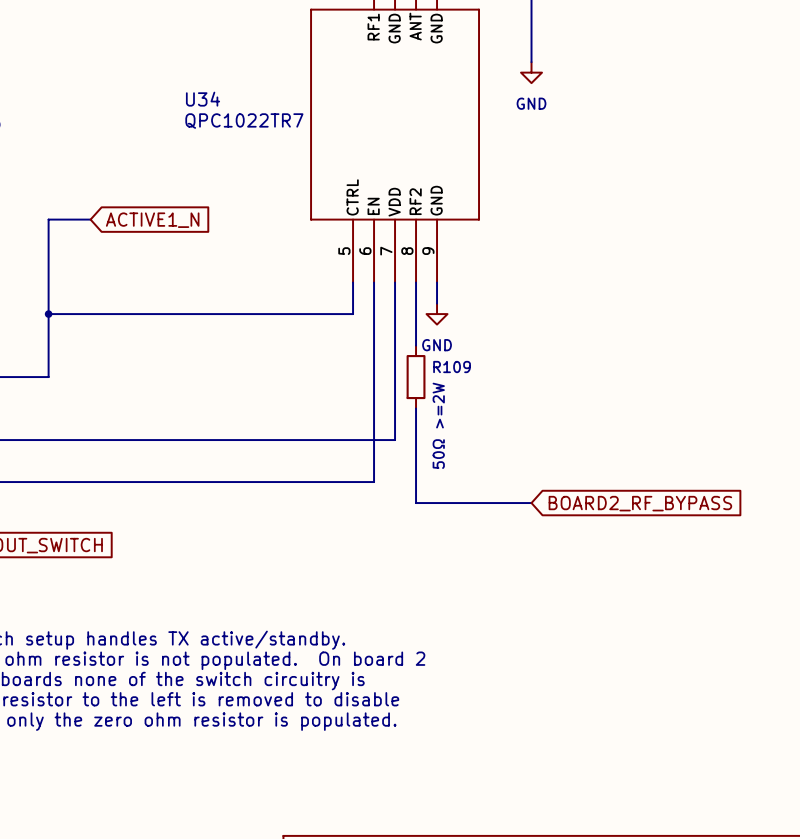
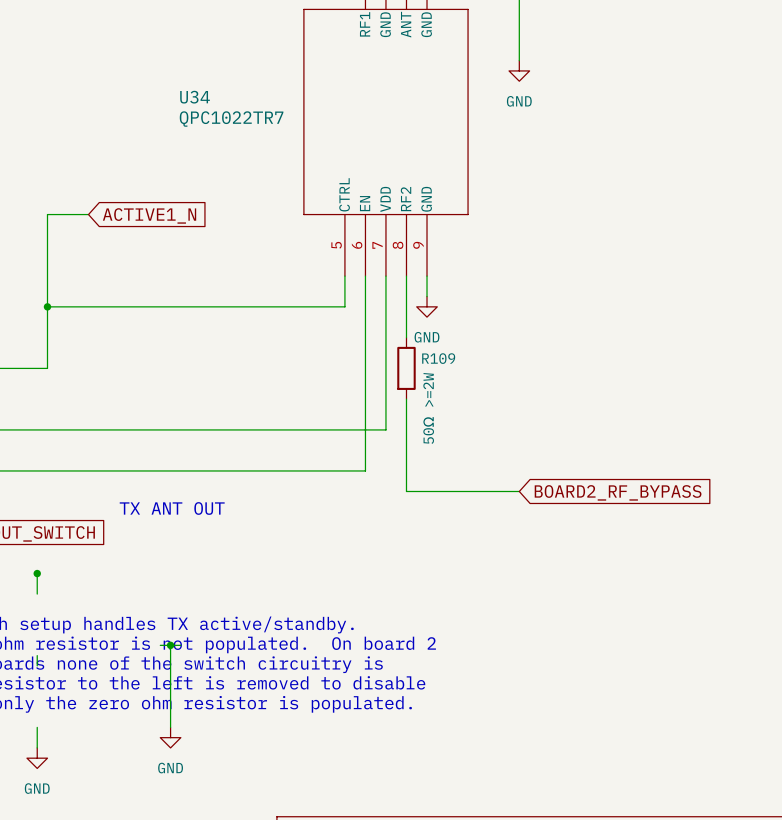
text: none -> TX ANT OUT (172, 508)
wire: none -> (37, 573) (37, 594)
junction: none -> (37, 573)
wire: none -> (160, 645) (180, 645)
wire: none -> (170, 645) (170, 727)
junction: none -> (170, 645)
wire: none -> (37, 655) (37, 665)
wire: none -> (37, 727) (37, 747)
power symbol: none -> GND (170, 737)
power symbol: none -> GND (37, 758)

